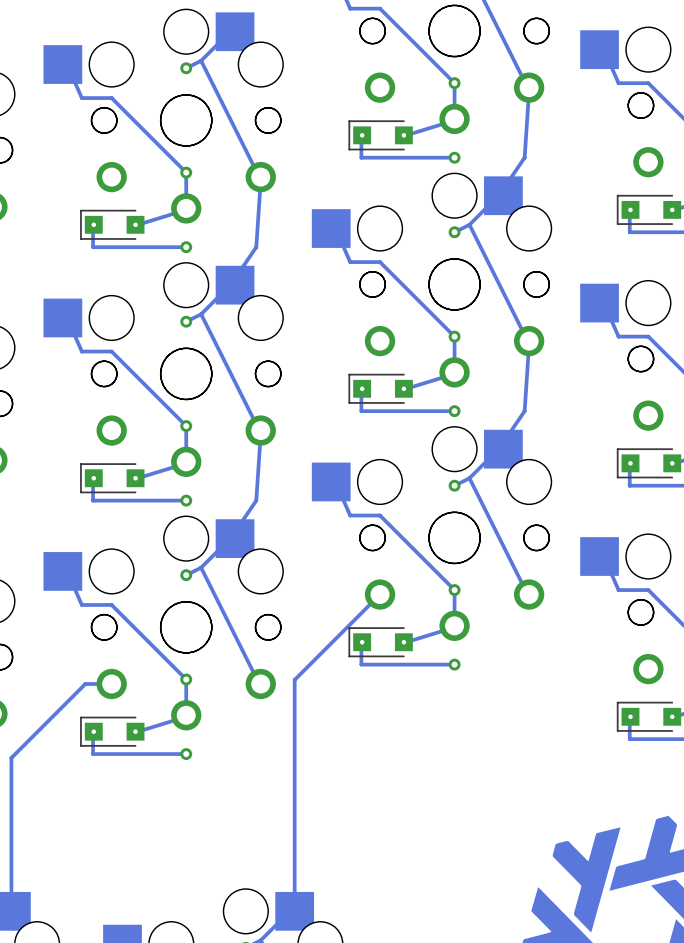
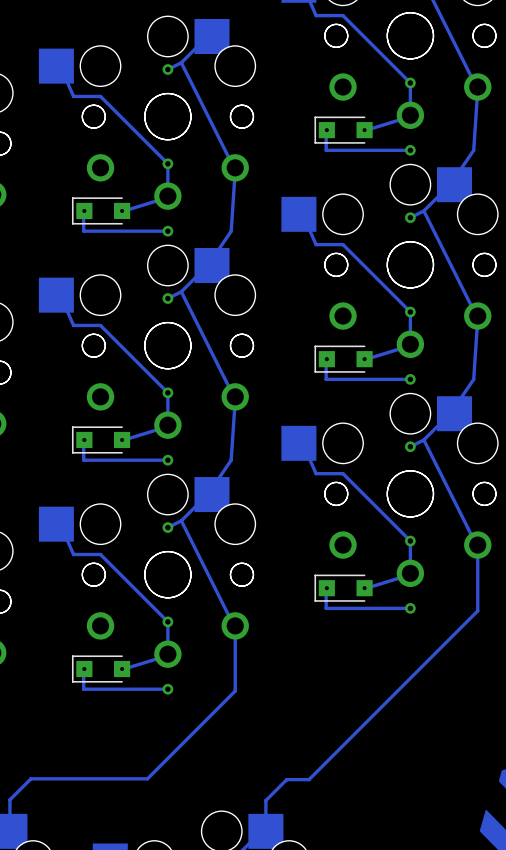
track: (380, 594) (294, 679) (294, 877) -> (477, 545) (477, 610) (309, 779) (286, 779) (265, 800)
track: (111, 683) (85, 683) (11, 757) (11, 876) -> (235, 625) (235, 691) (147, 778) (30, 778) (9, 799)

